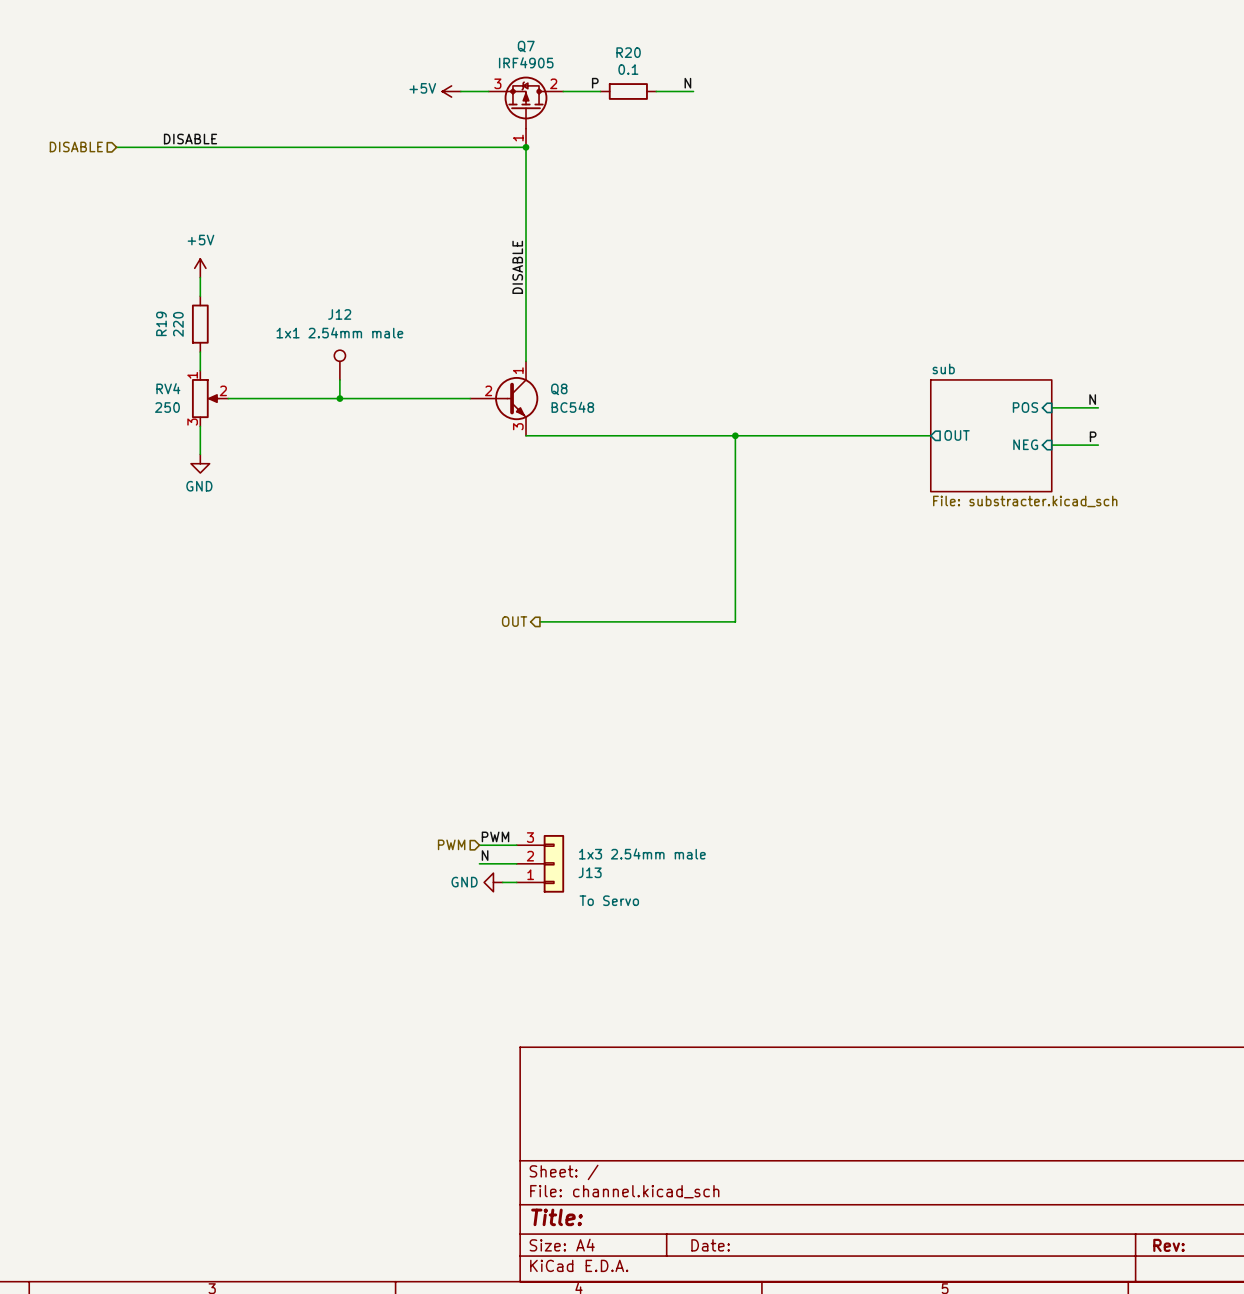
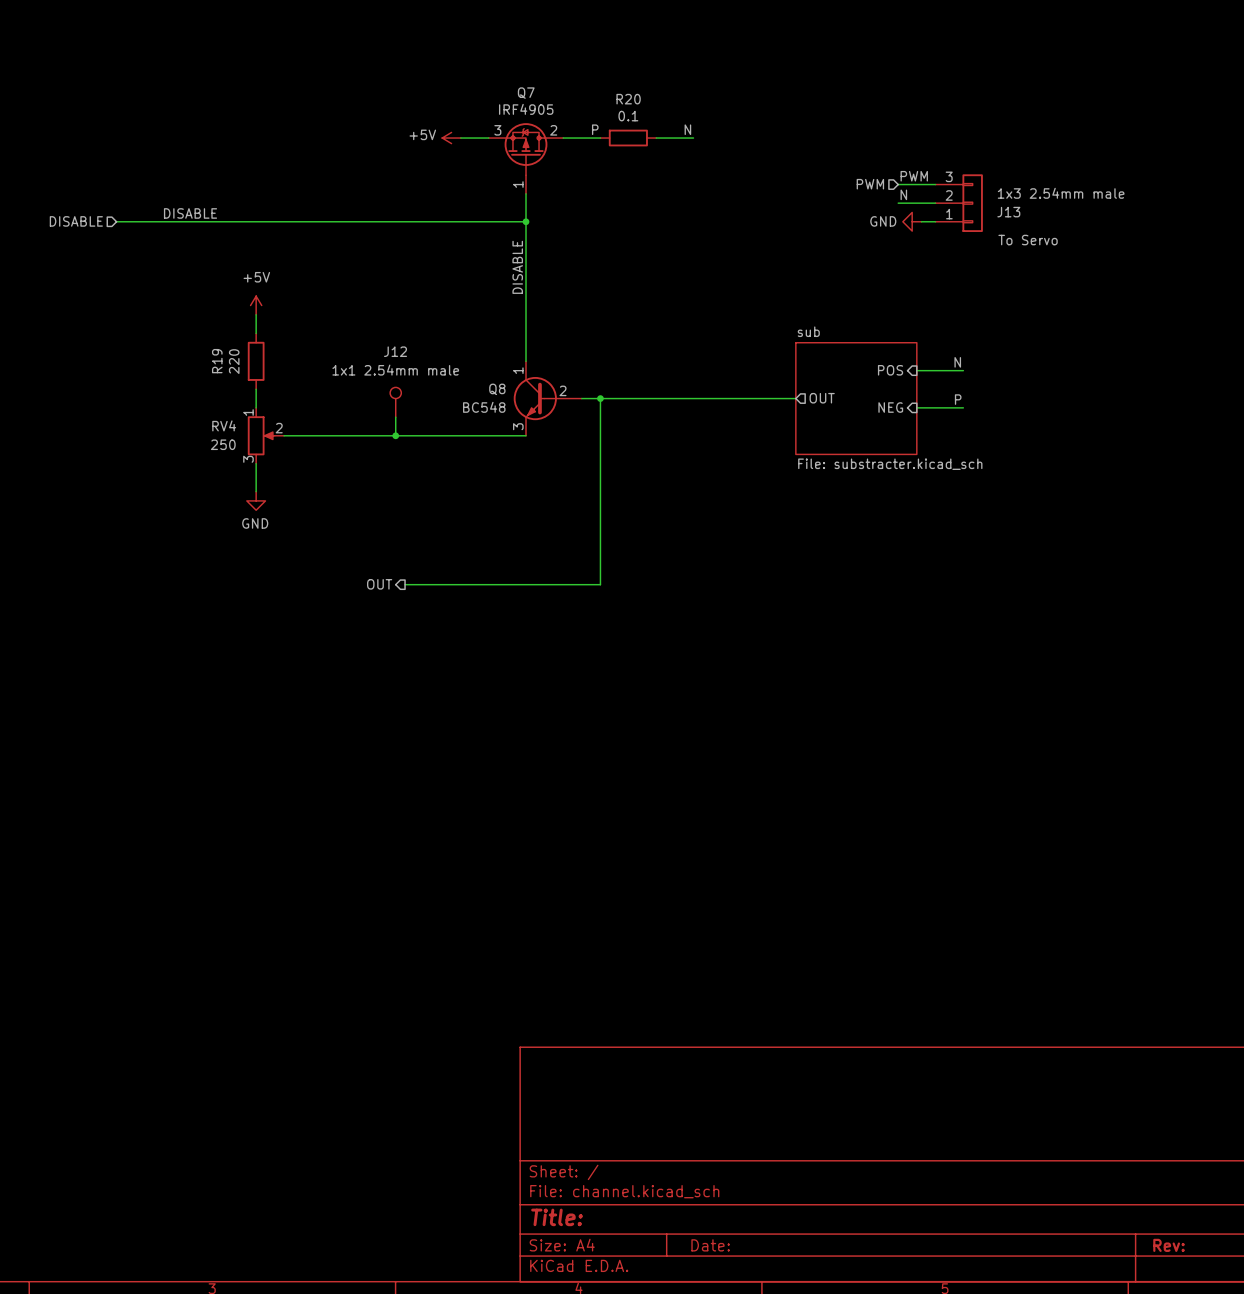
label position: P (595, 83) -> P (595, 129)
label position: N (687, 83) -> N (687, 129)
power symbol position: +5V (451, 91) -> +5V (451, 138)
wire: (460, 91) (488, 91) -> (460, 138) (488, 138)
wire: (563, 91) (600, 91) -> (563, 138) (600, 138)
R20 position: (628, 91) -> (628, 138)
wire: (656, 91) (693, 91) -> (656, 138) (693, 138)
Q7 position: (526, 111) -> (526, 158)
label position: DISABLE (190, 139) -> DISABLE (190, 213)
hierarchical label position: DISABLE (76, 146) -> DISABLE (76, 221)
wire: (116, 147) (526, 147) (526, 193) -> none
junction: (526, 147) -> none
label: none -> PWM (914, 176)
hierarchical label: none -> PWM (870, 184)
wire: none -> (898, 184) (935, 184)
label: none -> N (903, 194)
wire: none -> (898, 203) (935, 203)
wire: none -> (116, 221) (526, 221)
junction: none -> (526, 221)
power symbol: none -> GND (912, 221)
wire: none -> (921, 221) (935, 221)
power symbol position: +5V (200, 268) -> +5V (256, 305)
wire: (200, 277) (200, 296) -> (256, 314) (256, 333)
R19 position: (200, 324) -> (256, 361)
wire: (200, 352) (200, 370) -> (256, 389) (256, 407)
J12 position: (339, 365) -> (395, 402)
wire: (339, 379) (339, 398) -> (395, 417) (395, 435)
RV4 position: (210, 398) -> (265, 435)
wire: (228, 398) (470, 398) -> none
junction: (339, 398) -> none
Q8 flip: as is (516, 398) -> left-right (535, 398)
wire: none -> (581, 398) (795, 398)
junction: none -> (600, 398)
label position: N (1092, 399) -> N (957, 362)
sheet pin position: POS (1025, 407) -> POS (890, 370)
wire: (1051, 407) (1098, 407) -> (916, 370) (963, 370)
wire: (200, 426) (200, 454) -> (256, 463) (256, 491)
junction: none -> (395, 435)
wire: (526, 435) (930, 435) -> (526, 435) (284, 435)
wire: (735, 435) (735, 621) (539, 621) -> (600, 398) (600, 584) (405, 584)
junction: (735, 435) -> none
sheet pin position: OUT (957, 435) -> OUT (822, 398)
sheet sub position: (991, 435) -> (856, 398)
label position: P (1093, 436) -> P (958, 399)
sheet pin position: NEG (1025, 444) -> NEG (890, 407)
wire: (1051, 445) (1098, 445) -> (916, 407) (963, 407)
power symbol position: GND (200, 463) -> GND (256, 500)
hierarchical label position: OUT (514, 621) -> OUT (379, 584)
label: PWM (495, 836) -> none
hierarchical label: PWM (451, 844) -> none
wire: (479, 845) (516, 845) -> none
label: N (485, 855) -> none
wire: (479, 863) (516, 863) -> none
J13 position: (540, 863) -> (959, 203)
power symbol: GND (493, 882) -> none
wire: (502, 882) (516, 882) -> none

